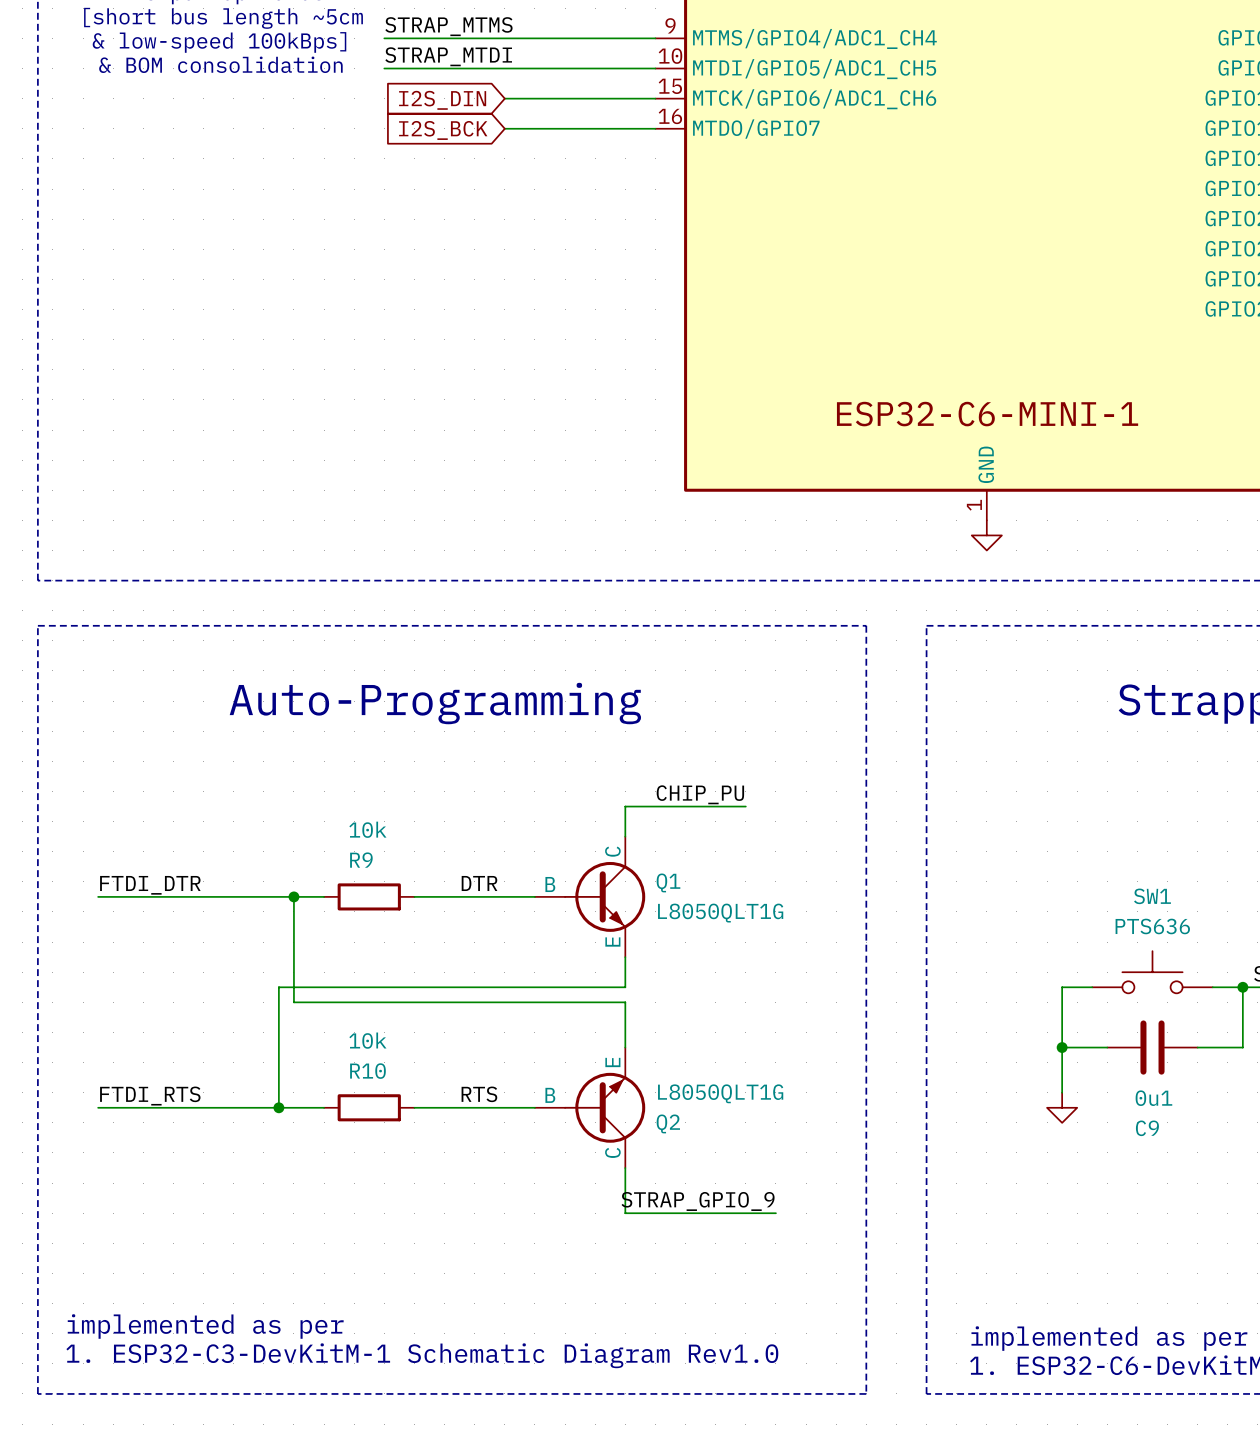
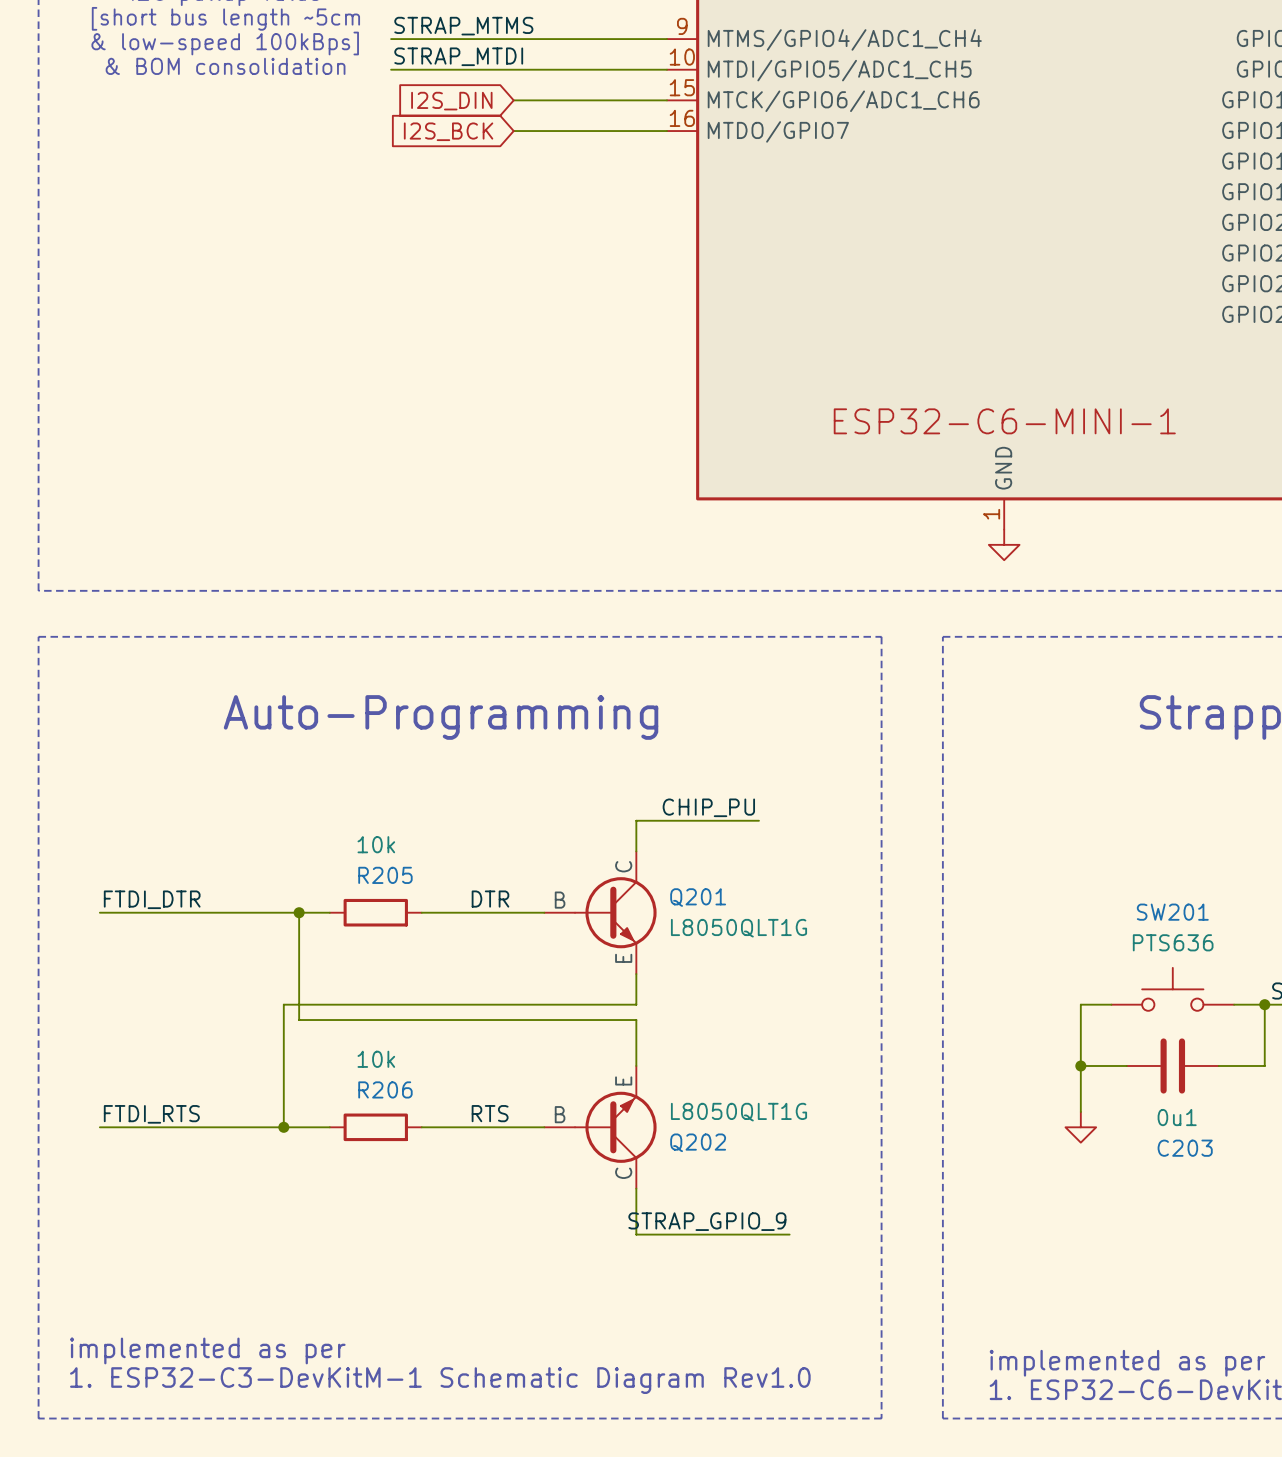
R9 name: R9 (361, 860) -> R205 (385, 875)
Q1 name: Q1 (668, 882) -> Q201 (698, 897)
SW1 name: SW1 (1152, 896) -> SW201 (1172, 912)
R10 name: R10 (367, 1071) -> R206 (385, 1089)
Q2 name: Q2 (668, 1123) -> Q202 (698, 1142)
C9 name: C9 (1147, 1128) -> C203 (1185, 1148)

